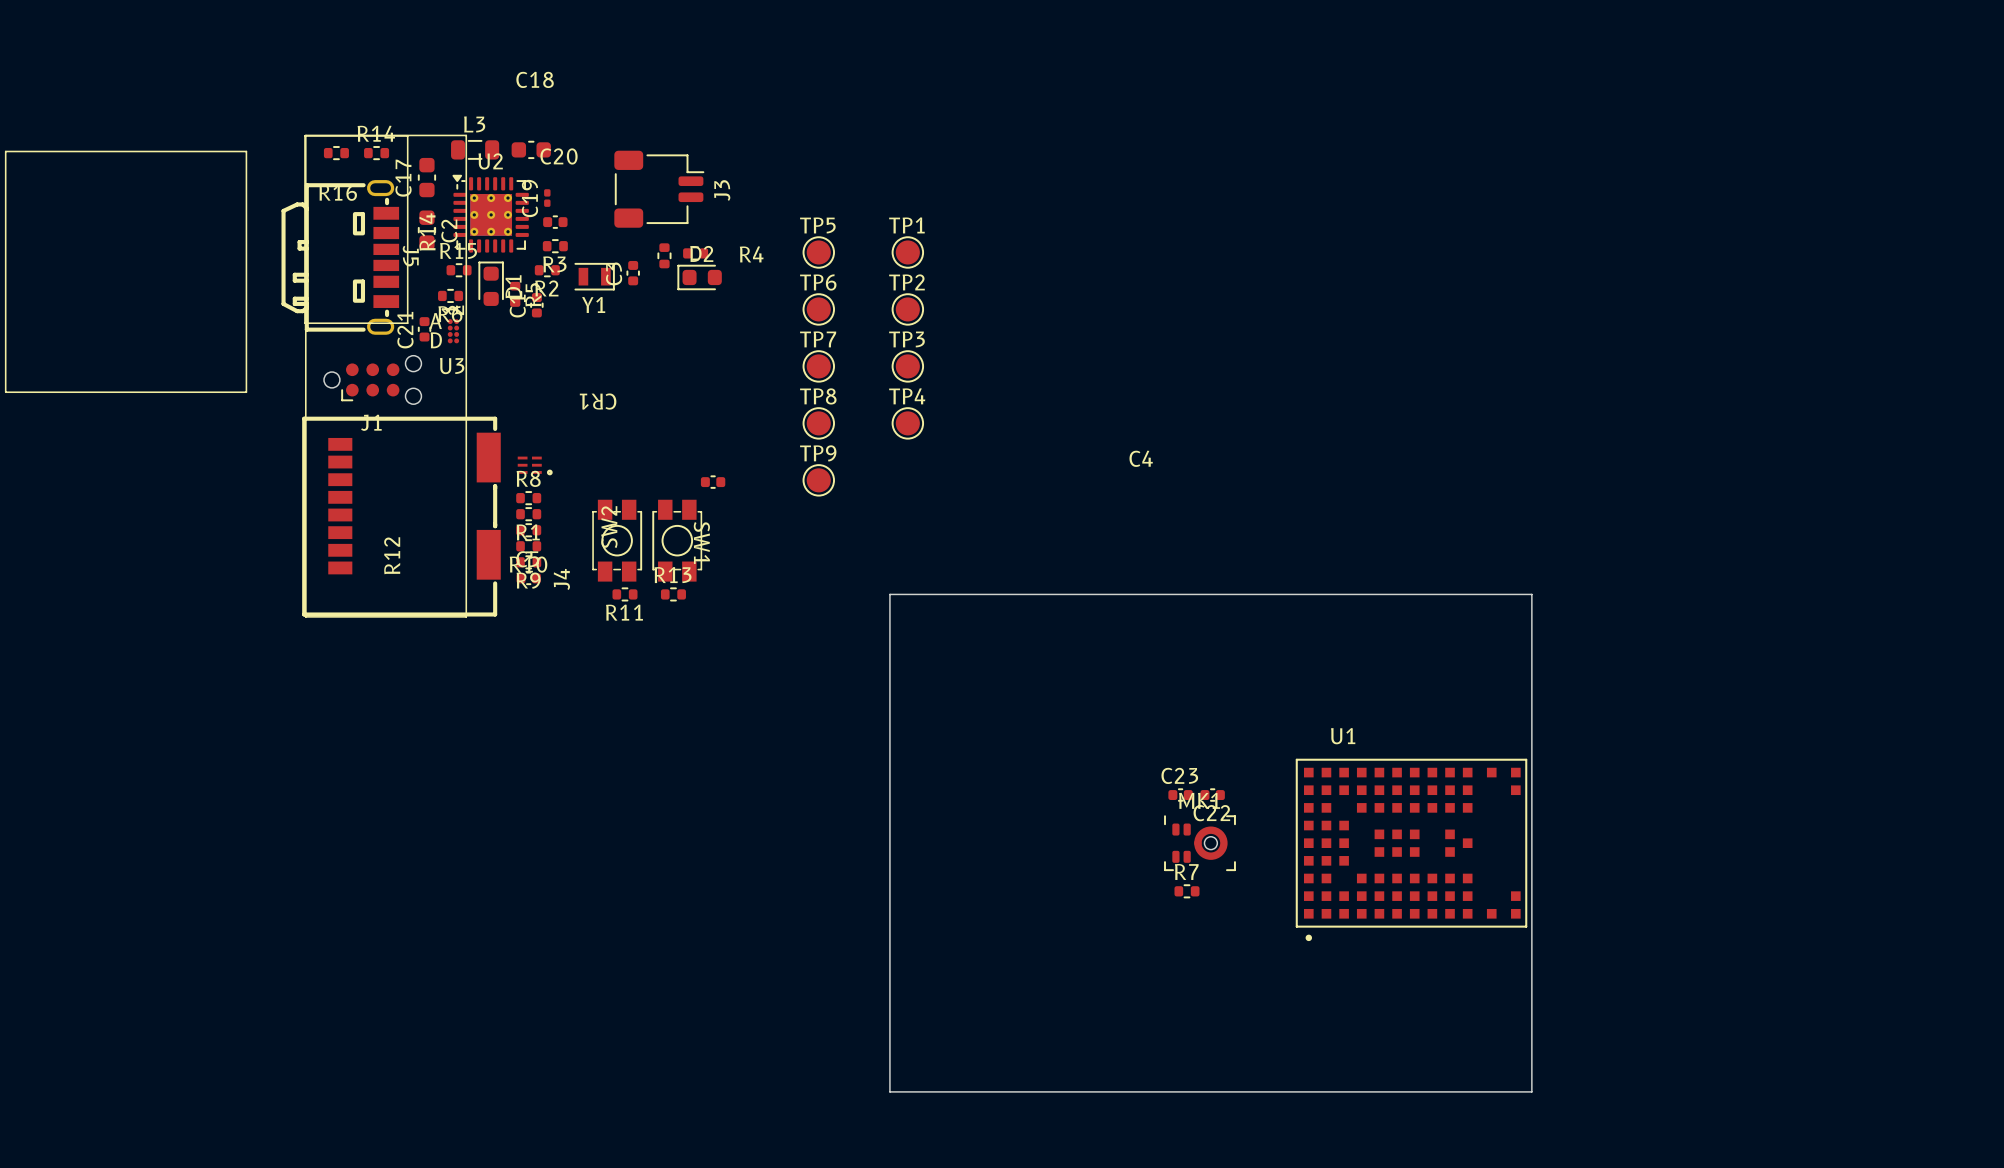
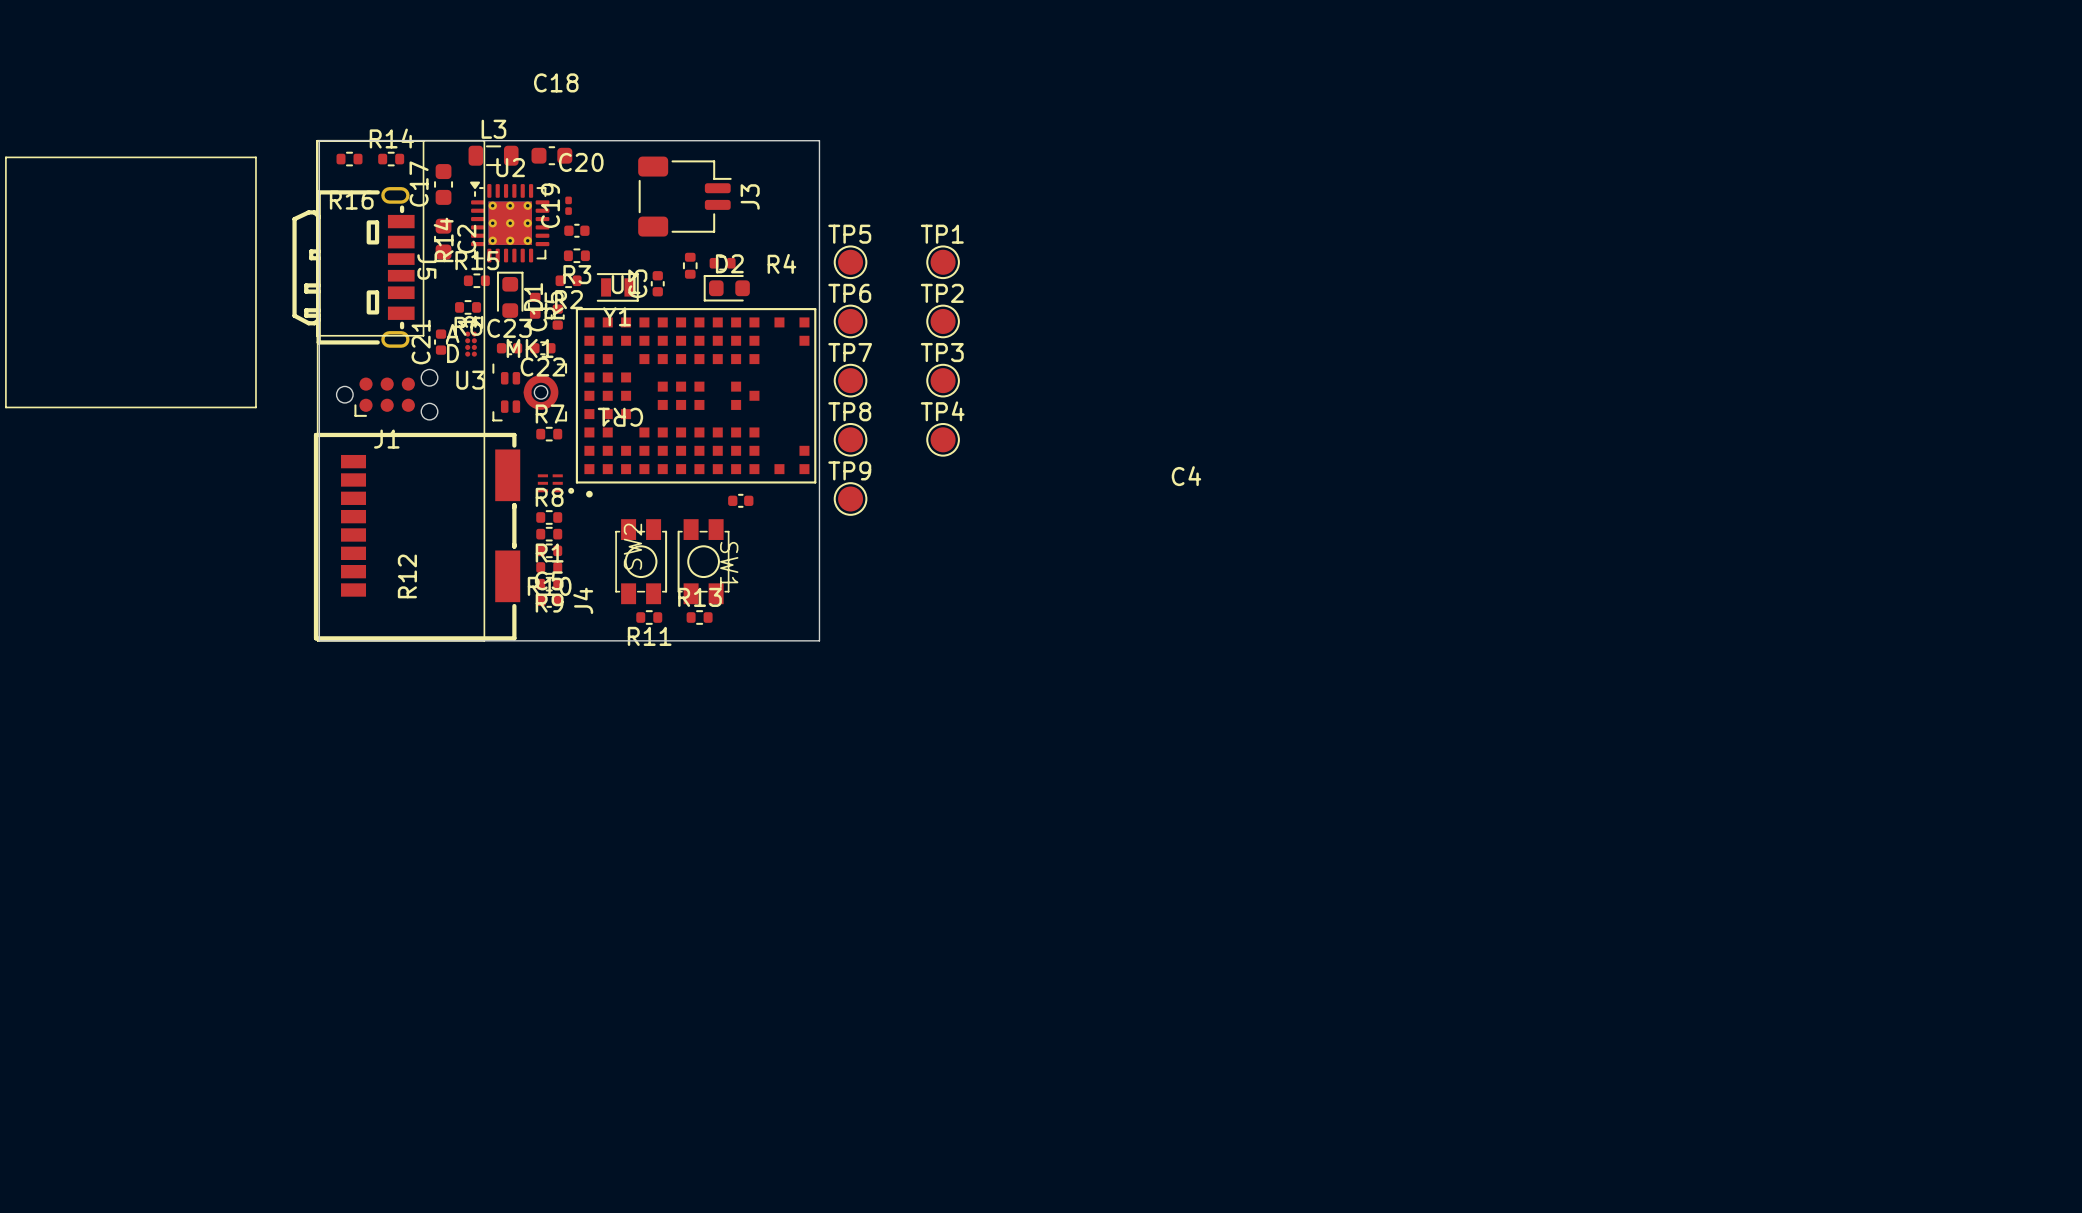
board edge: none -> (319, 140) (819, 140) (819, 640) (319, 640) (319, 140)
board edge: (889, 594) (1531, 594) (1531, 1091) (889, 1091) (889, 594) -> none
C23 position: (1180, 795) -> (509, 348)
C22 position: (1212, 795) -> (542, 348)
MK1 position: (1199, 843) -> (529, 392)
U1 position: (1411, 849) -> (696, 402)
R7 position: (1186, 891) -> (549, 434)

